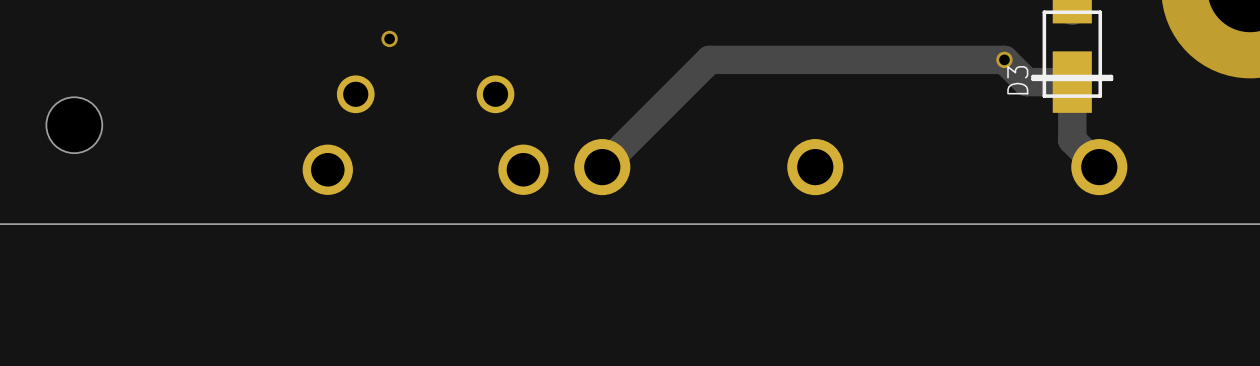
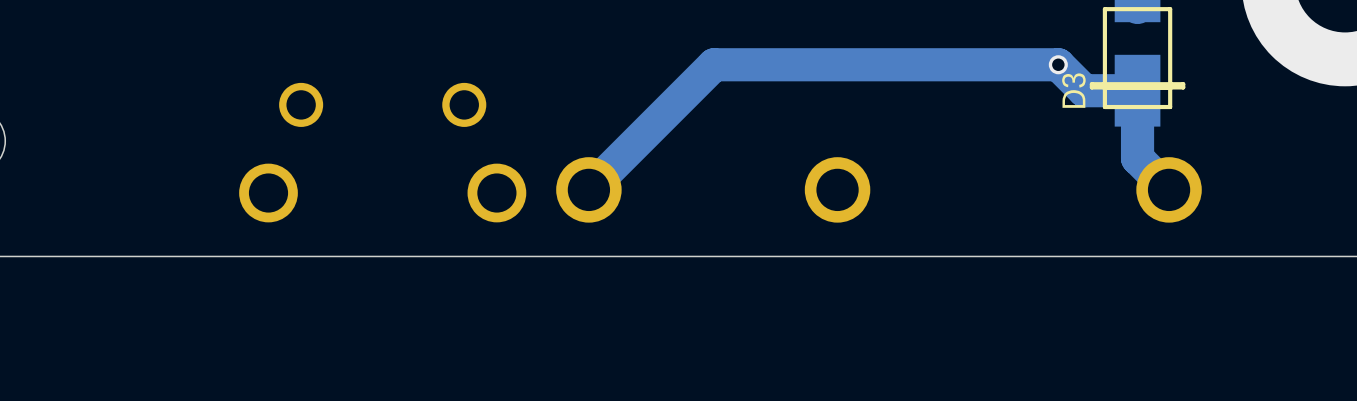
via: (389, 38) -> none

